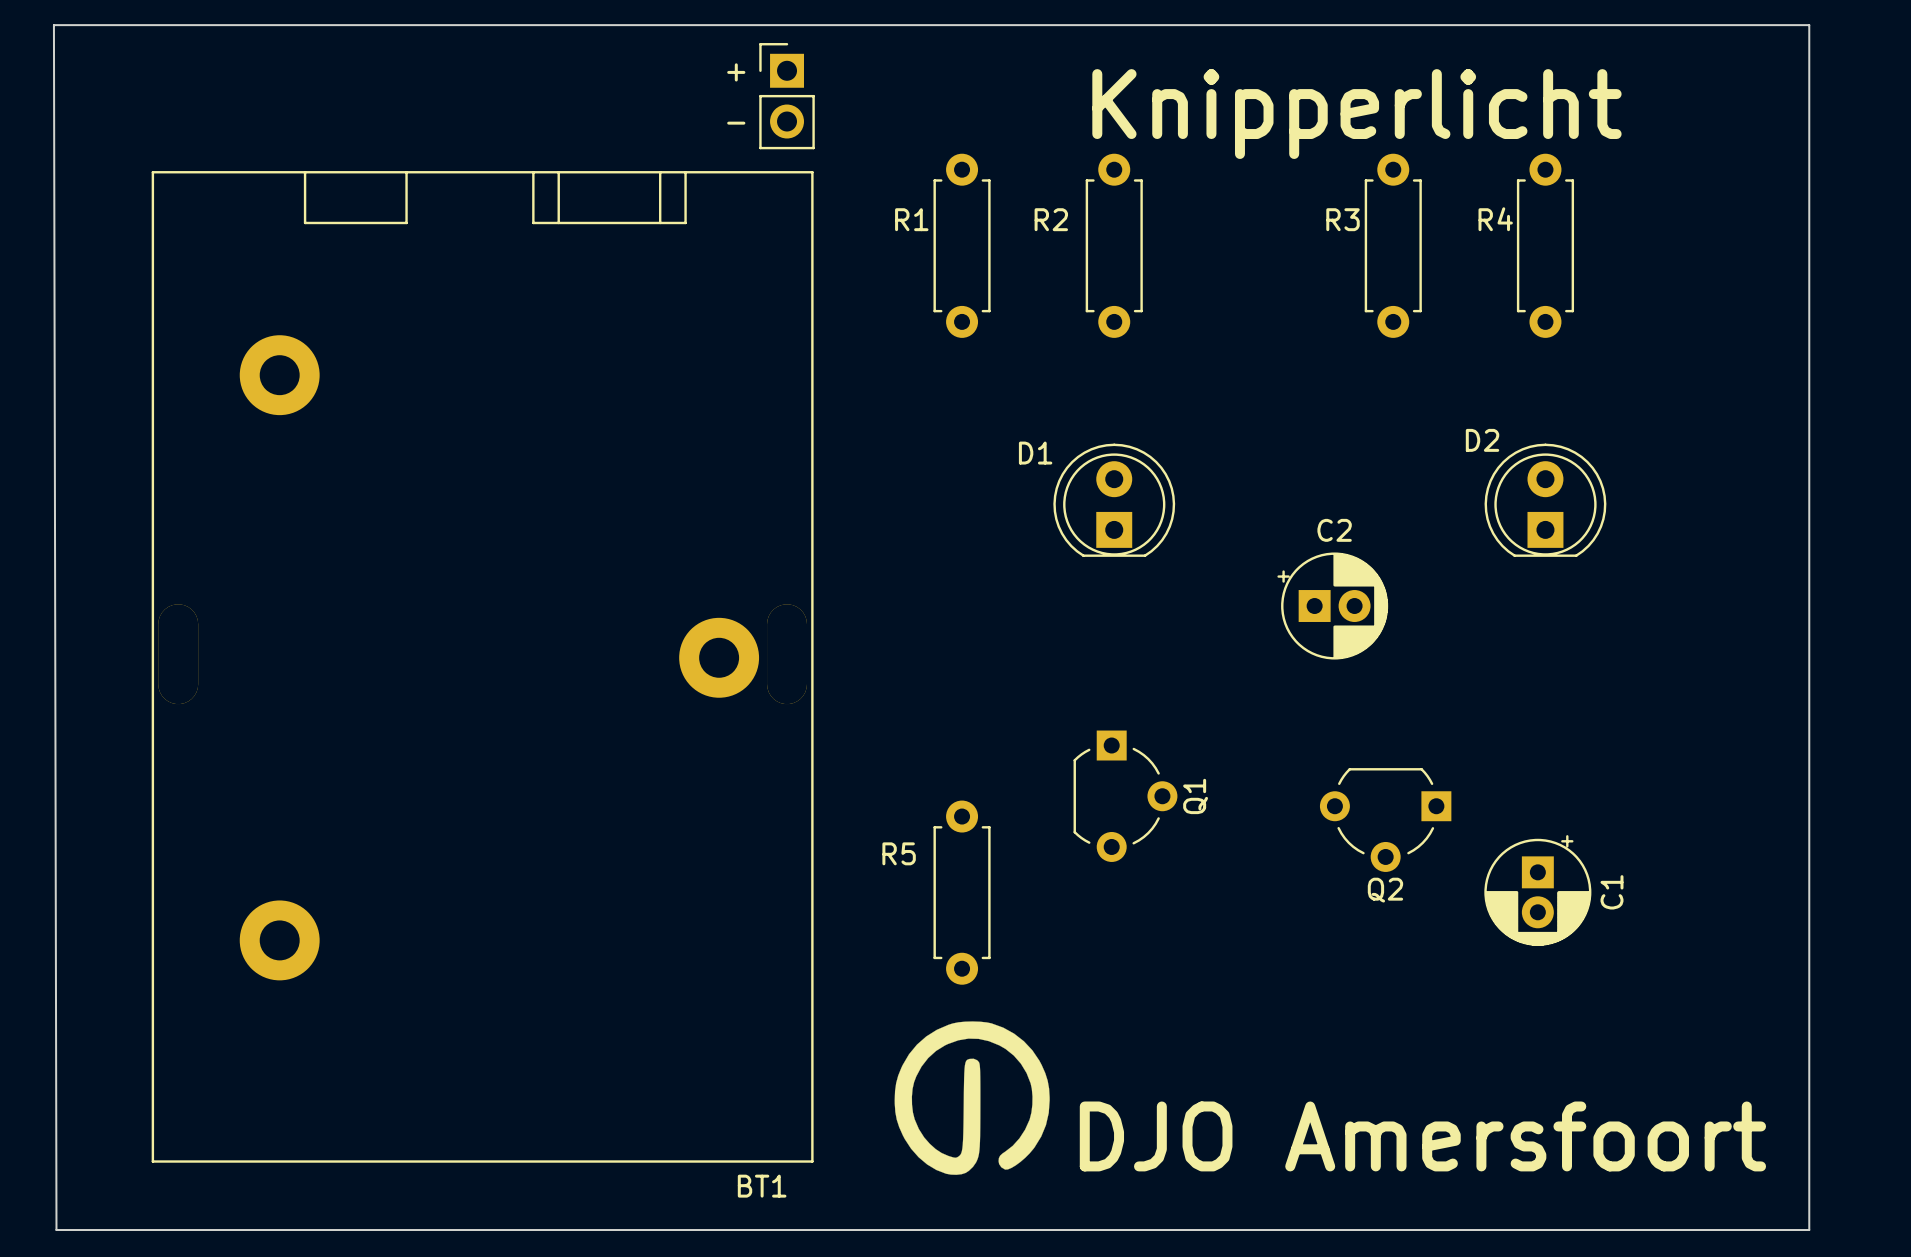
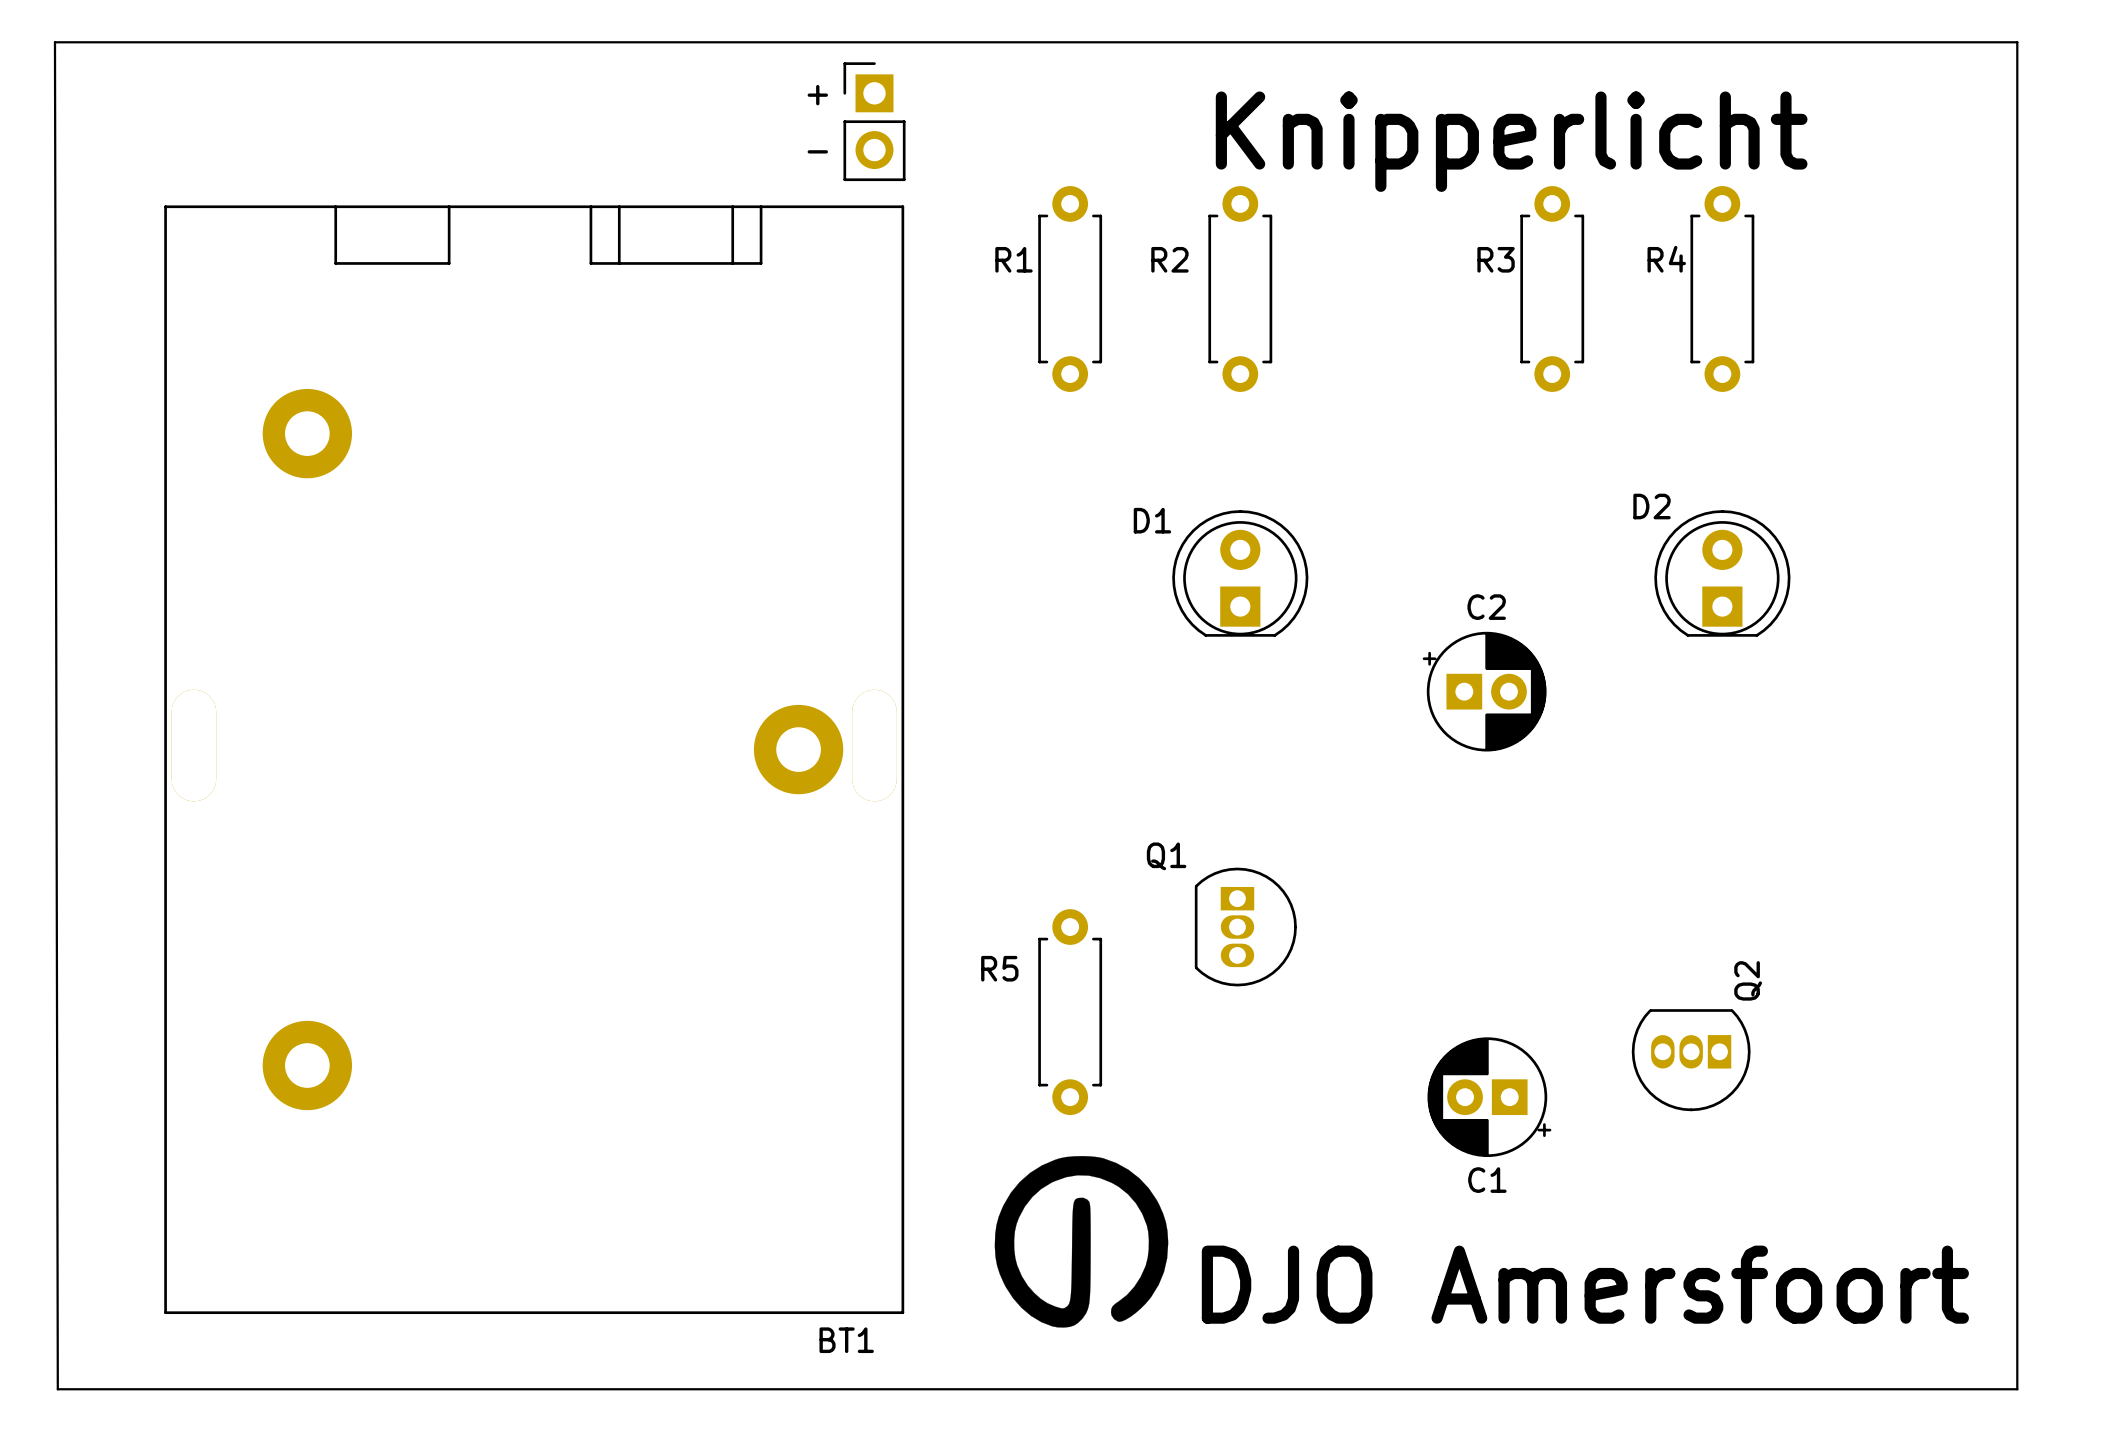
Q1 footprint: [1073, 730, 1178, 862] -> [1194, 867, 1297, 987]
Q2 footprint: [1319, 768, 1452, 872] -> [1631, 1009, 1751, 1112]
Q1 name position: Q1 (1195, 796) -> Q1 (1166, 856)
Q2 name position: Q2 (1385, 890) -> Q2 (1748, 980)
C1 rotation: 0° (1537, 890) -> 90° clockwise (1489, 1097)
C1 position: (1537, 890) -> (1489, 1097)

